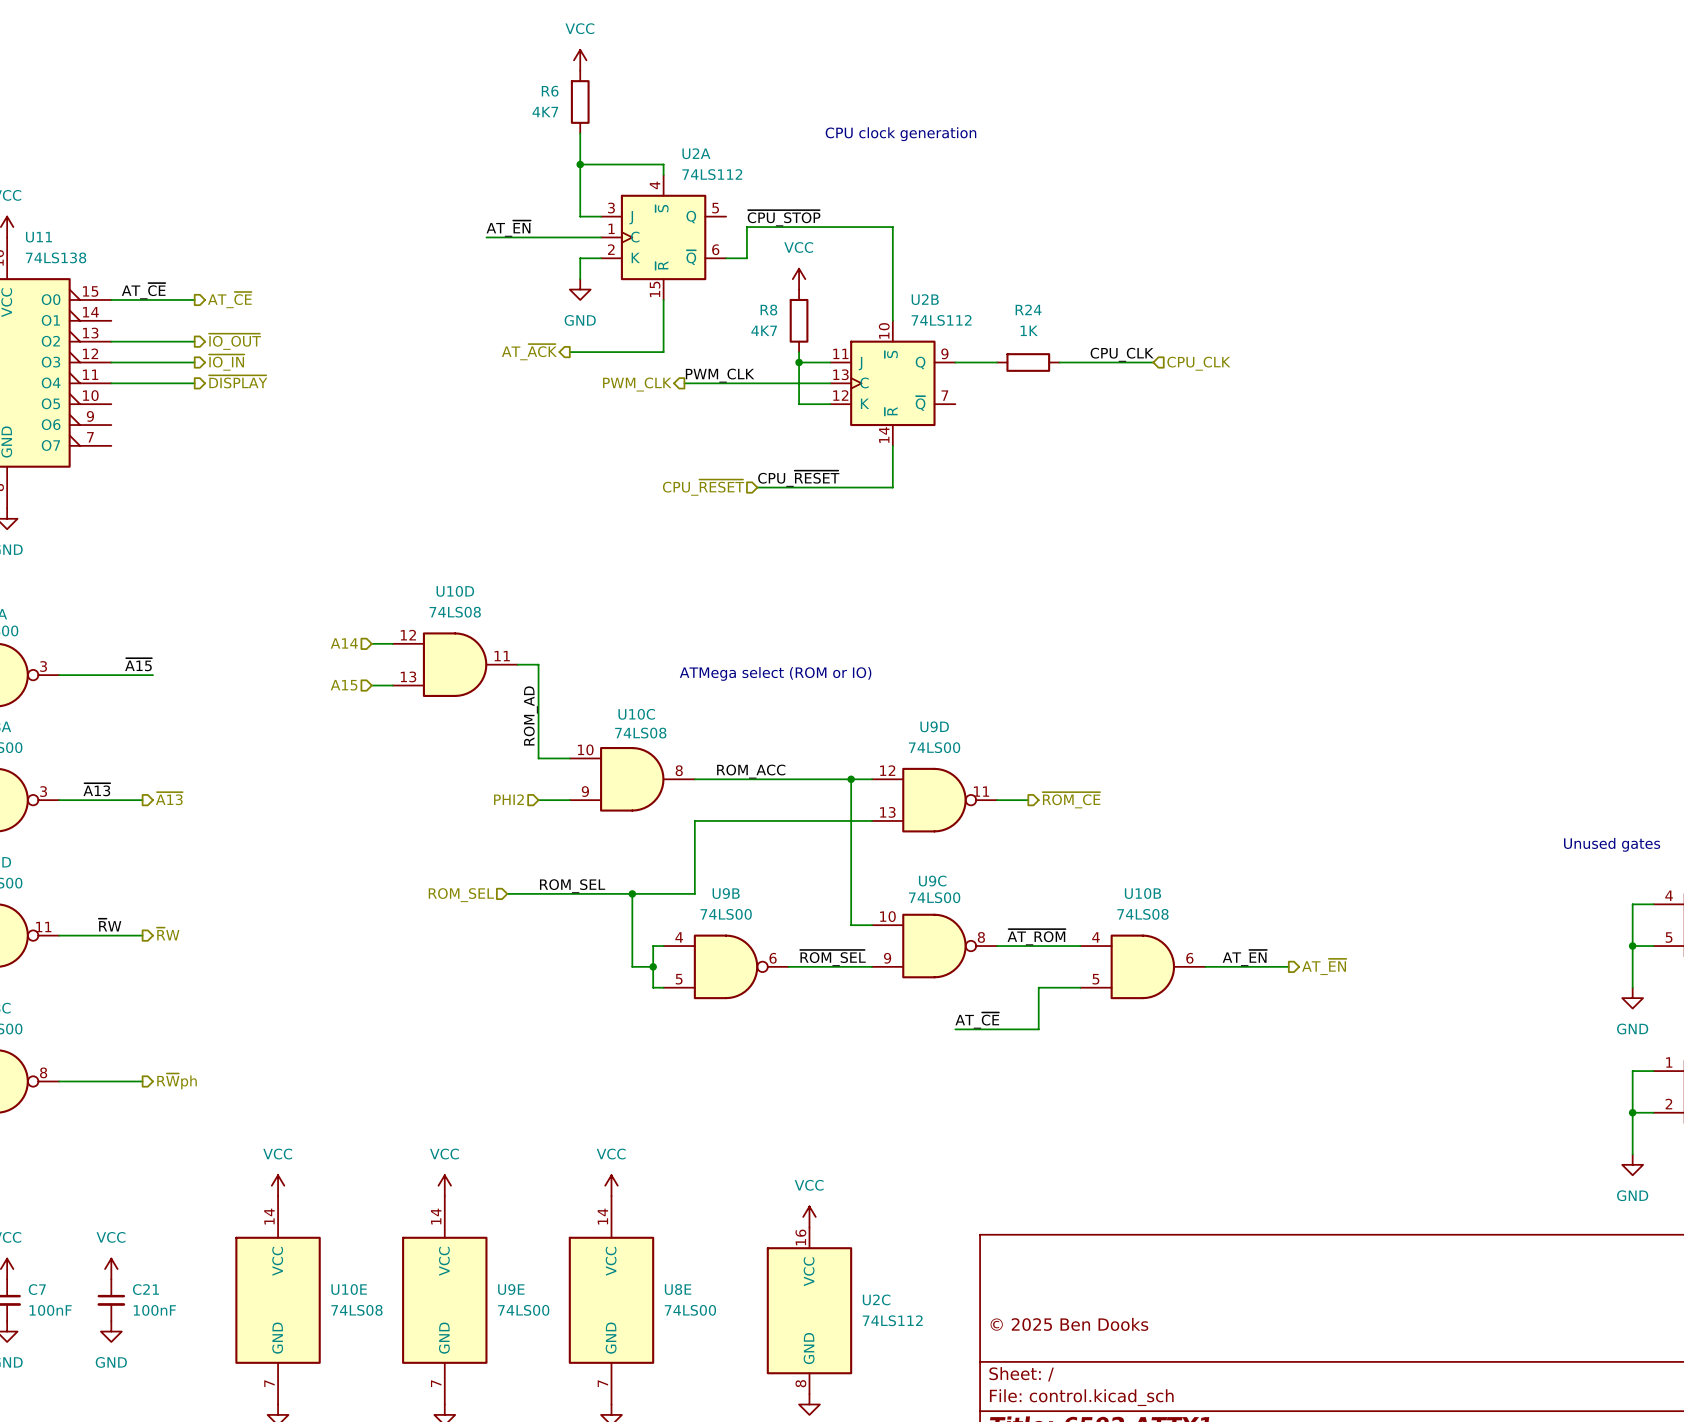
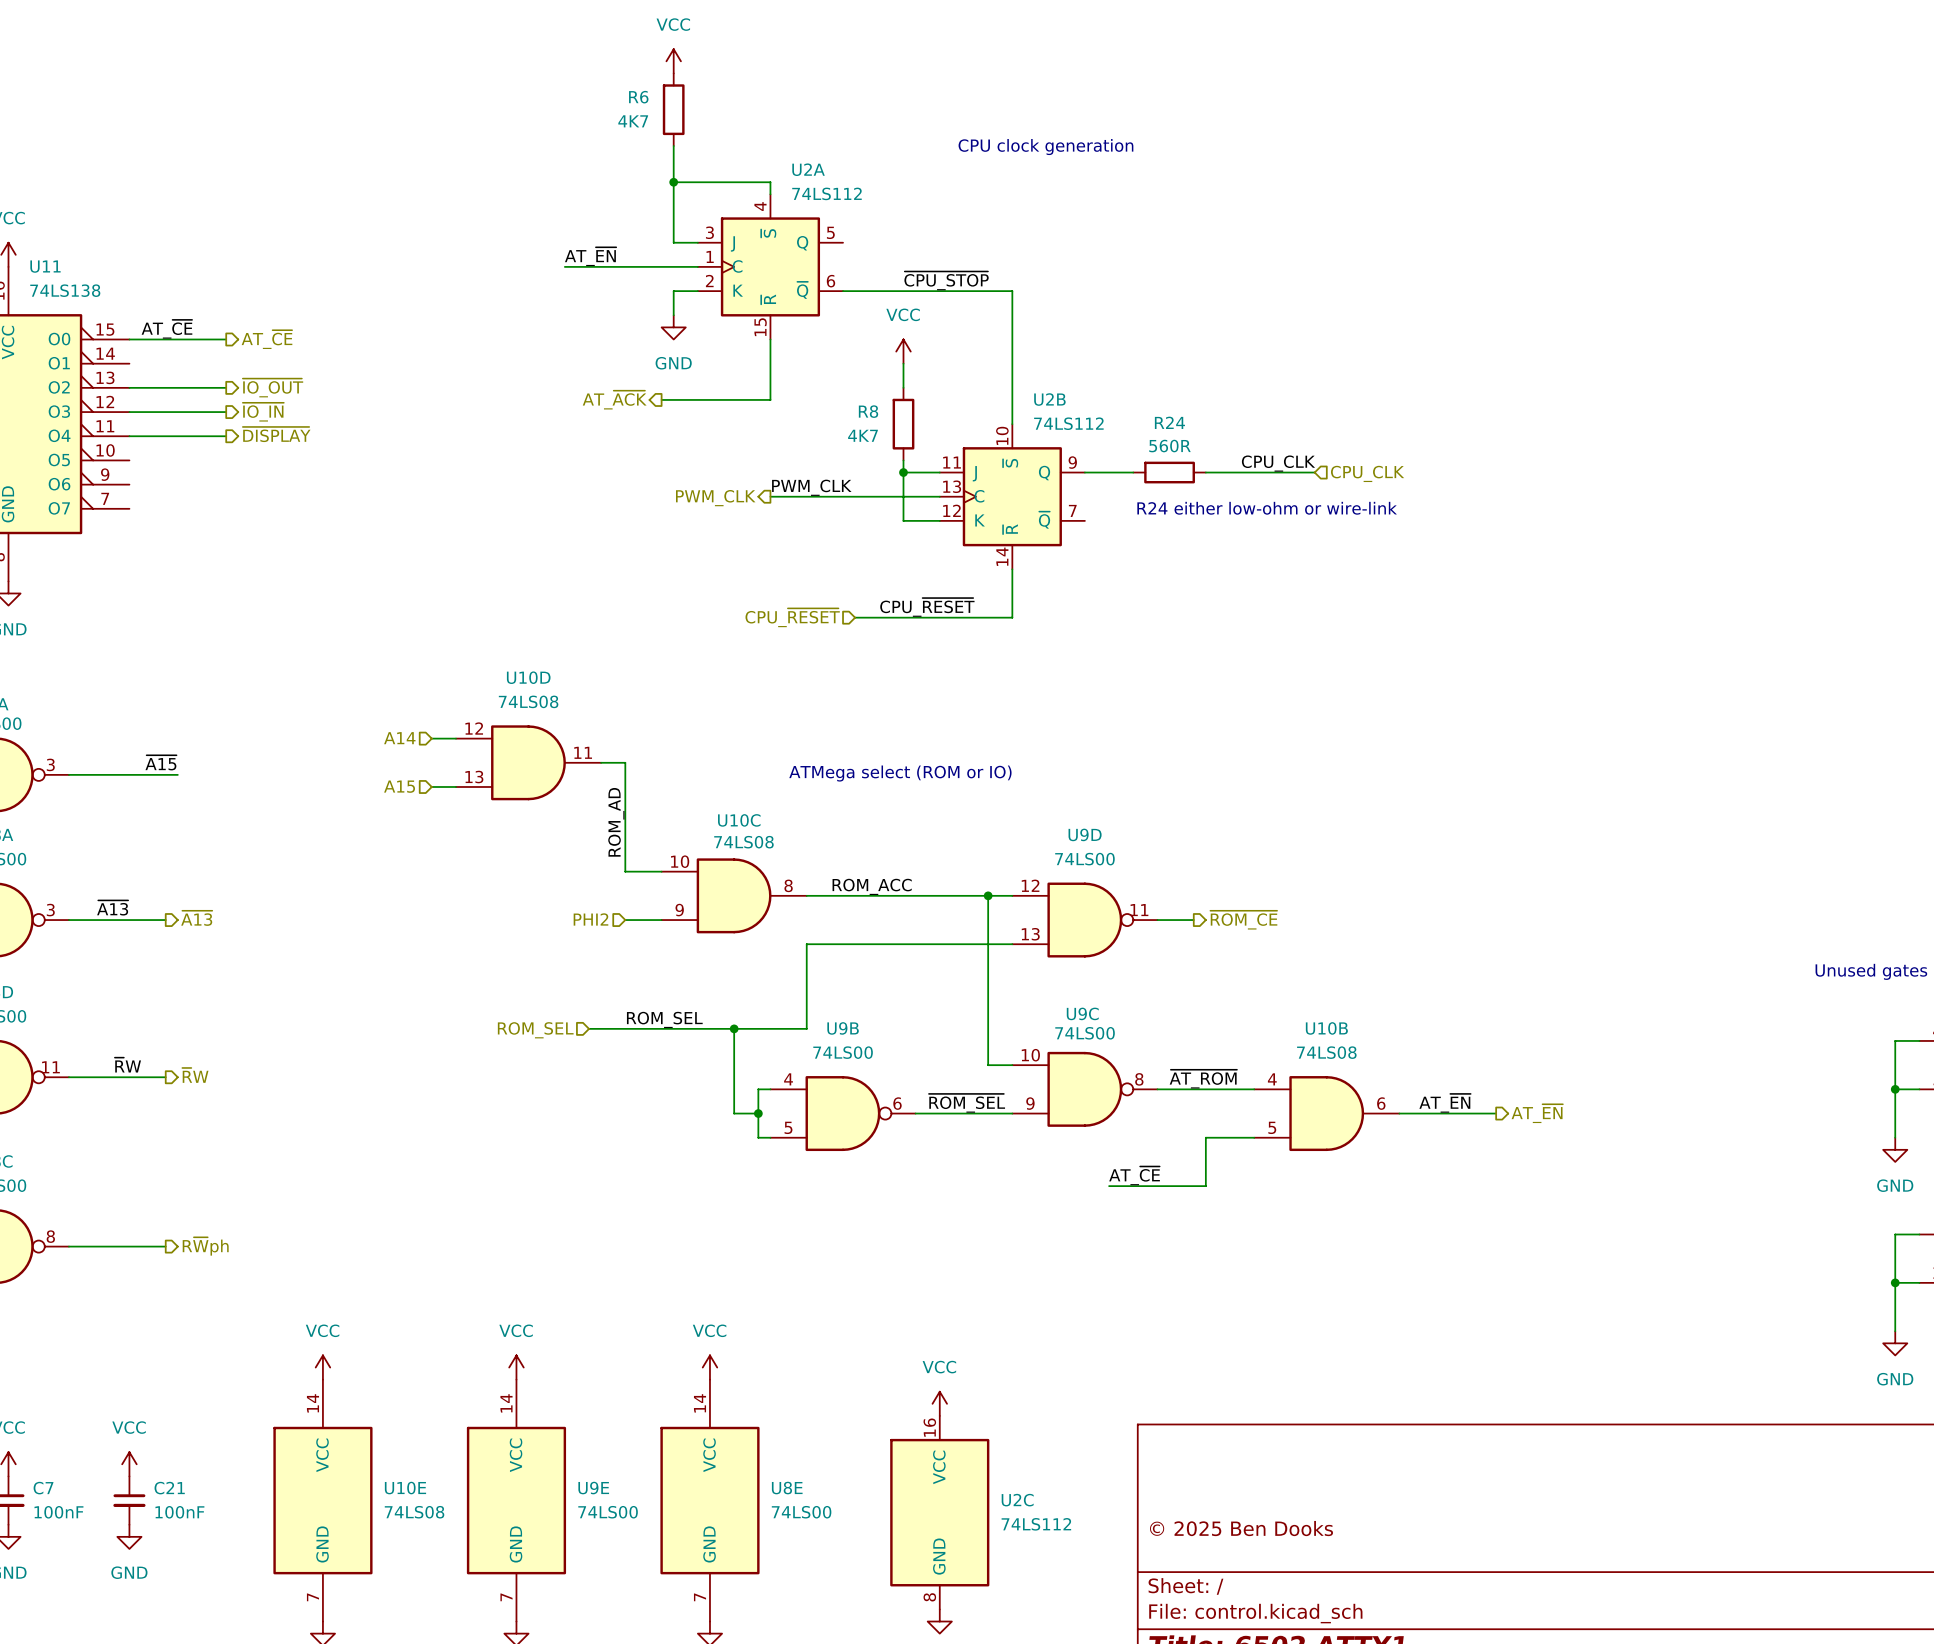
label position: ~{CPU_STOP} (784, 218) -> ~{CPU_STOP} (946, 280)
wire: (746, 258) (746, 227) (892, 227) (892, 320) -> (867, 291) (1012, 291) (1012, 424)
power symbol position: VCC (799, 279) -> VCC (903, 351)
R24 name position: R24 (1028, 309) -> R24 (1169, 422)
wire: none -> (903, 363) (903, 387)
R8 position: (799, 320) -> (903, 424)
R24 value: 1K (1029, 330) -> 560R (1169, 446)
wire: (799, 352) (799, 404) (830, 404) -> (903, 460) (903, 520) (939, 520)
label position: CPU_CLK (1122, 354) -> CPU_CLK (1278, 463)
wire: (799, 362) (830, 362) -> (903, 472) (939, 472)
junction: (799, 362) -> none
wire: (955, 362) (997, 362) -> (1084, 472) (1133, 472)
R24 position: (1028, 362) -> (1169, 472)
wire: (1059, 362) (1153, 362) -> (1205, 472) (1314, 472)
hierarchical label position: CPU_CLK (1198, 363) -> CPU_CLK (1367, 473)
label position: PWM_CLK (720, 375) -> PWM_CLK (811, 487)
wire: (684, 383) (830, 383) -> (770, 496) (939, 496)
U2B position: (892, 383) -> (1012, 496)
hierarchical label position: PWM_CLK (637, 384) -> PWM_CLK (715, 498)
junction: none -> (903, 472)
wire: (892, 445) (892, 487) (757, 487) -> (1012, 569) (1012, 617) (855, 617)
text: none -> R24 either low-ohm or wire-link (1267, 508)
label position: CPU_~{RESET} (798, 478) -> CPU_~{RESET} (927, 607)
hierarchical label position: CPU_~{RESET} (703, 487) -> CPU_~{RESET} (792, 617)

